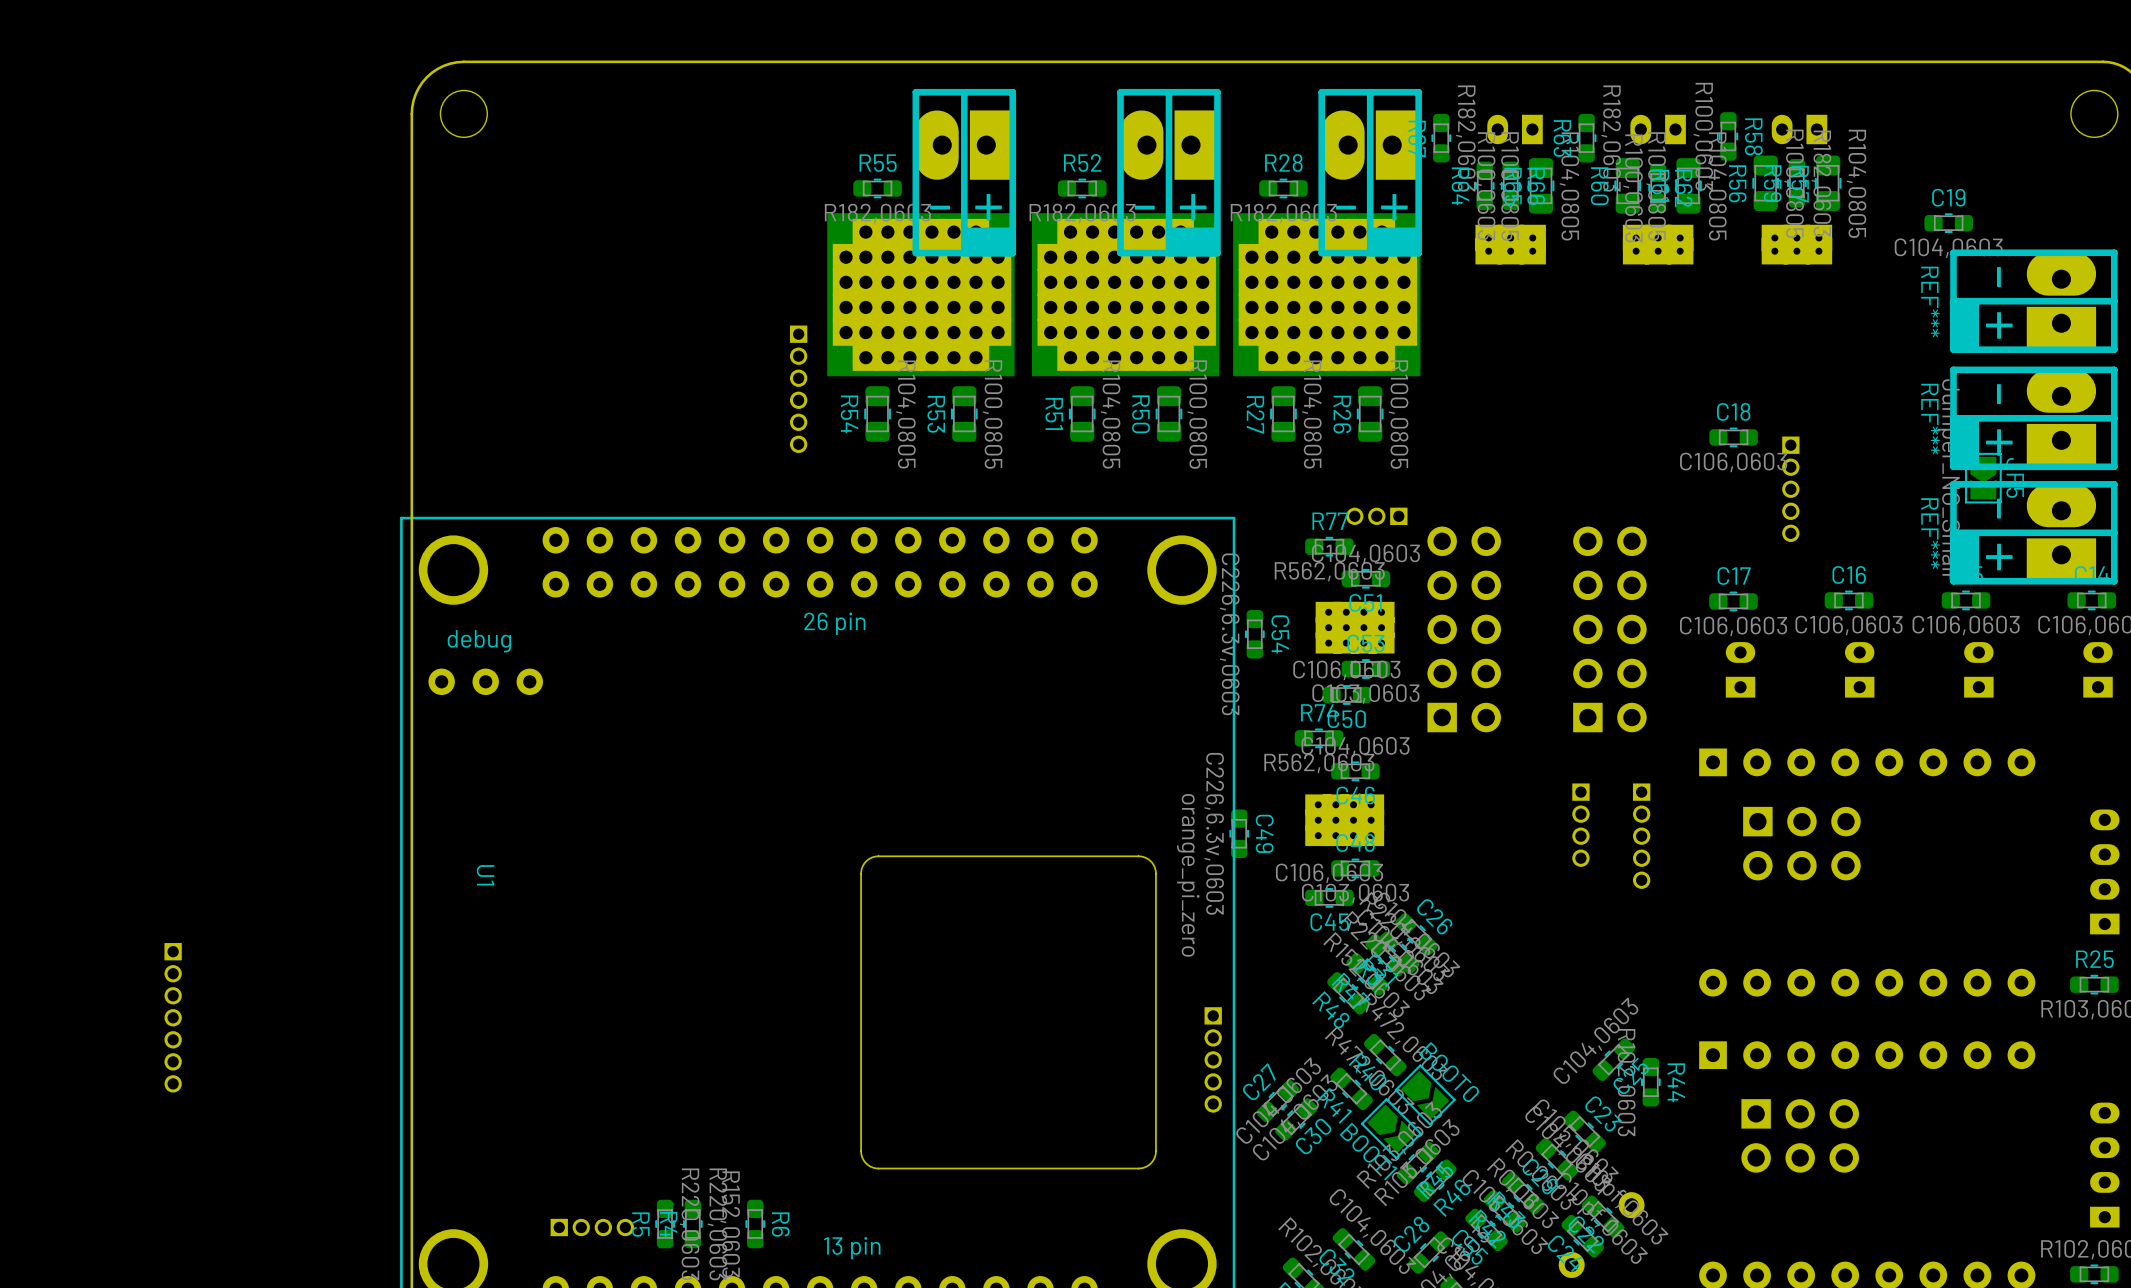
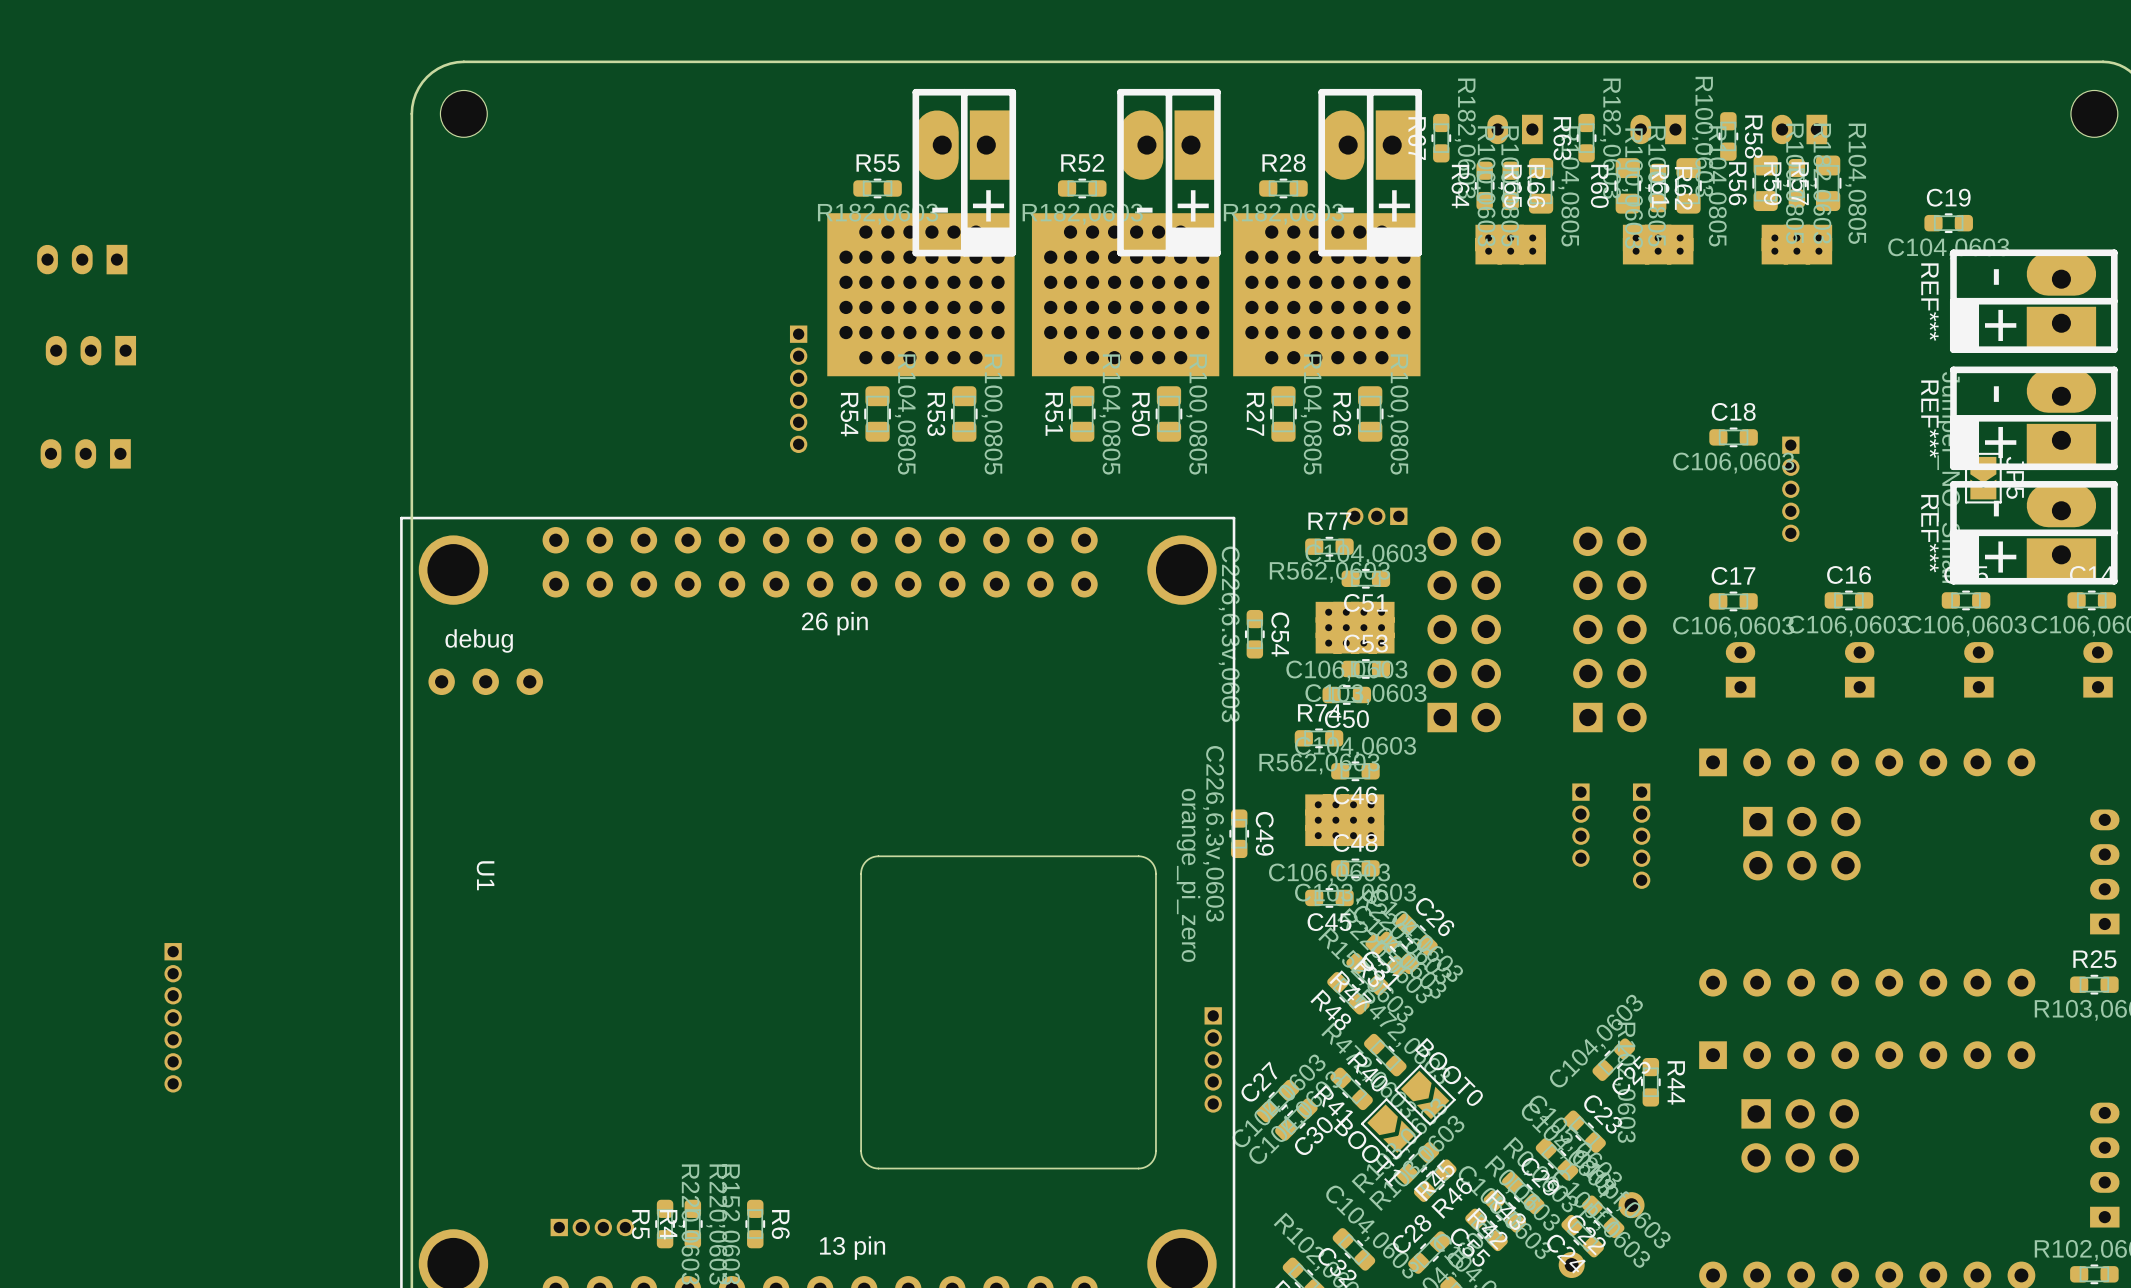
part: none -> (82, 259)
part: none -> (90, 350)
part: none -> (85, 453)

